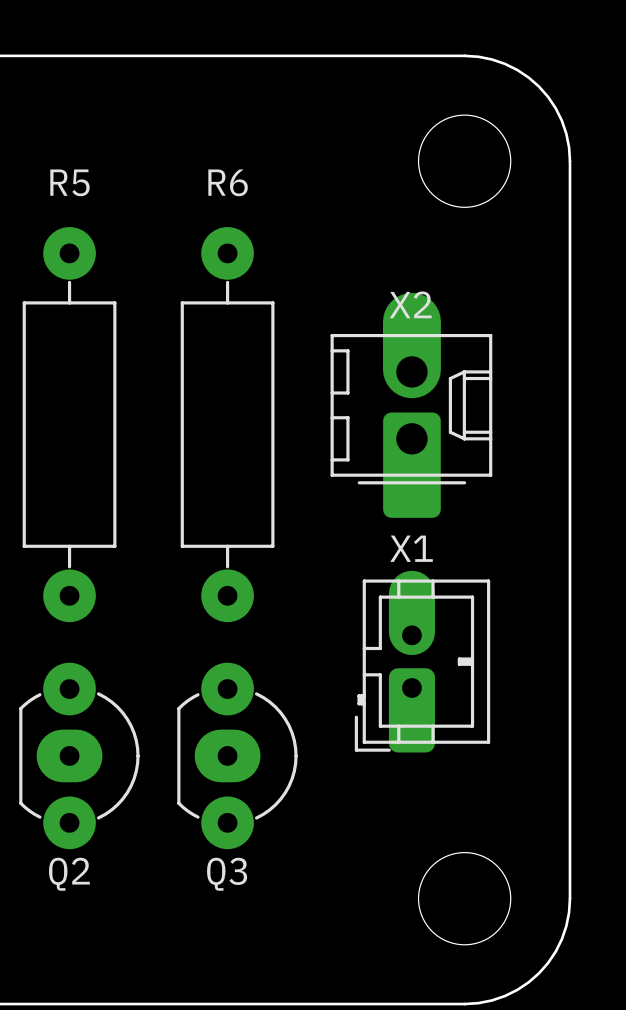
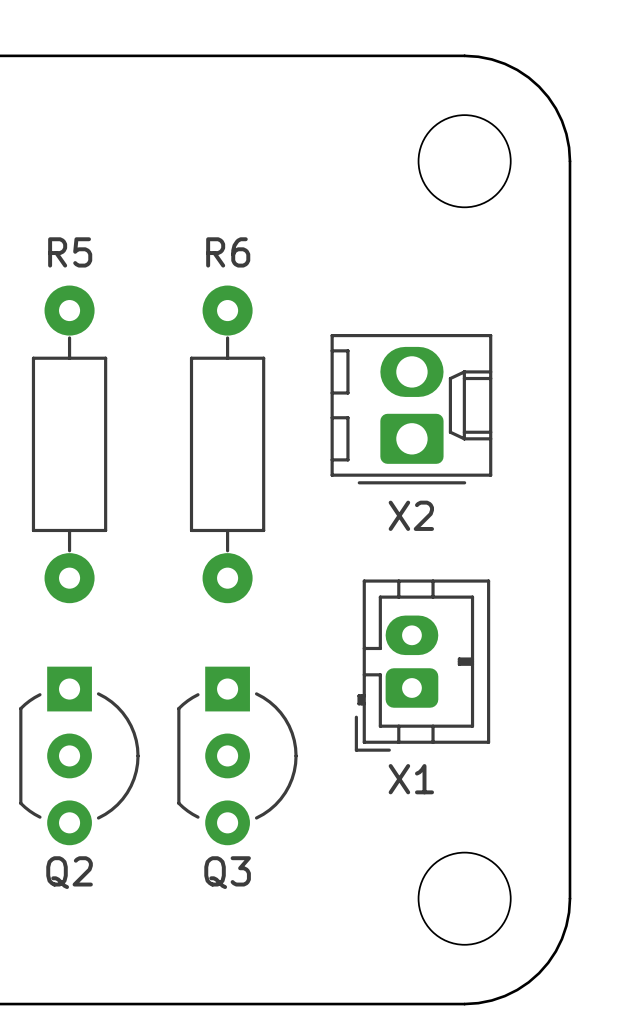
R5 footprint: [22, 227, 117, 623] -> [31, 285, 108, 604]
R6 footprint: [180, 227, 275, 623] -> [189, 285, 266, 604]
X2 footprint: [330, 292, 493, 518] -> [330, 333, 493, 485]
X2 name position: X2 (410, 304) -> X2 (411, 515)
X1 name position: X1 (411, 548) -> X1 (411, 779)
X1 footprint: [354, 570, 491, 753] -> [354, 579, 491, 752]
Q2 footprint: [19, 662, 140, 850] -> [19, 666, 140, 846]
Q3 footprint: [177, 662, 298, 850] -> [177, 666, 298, 846]

